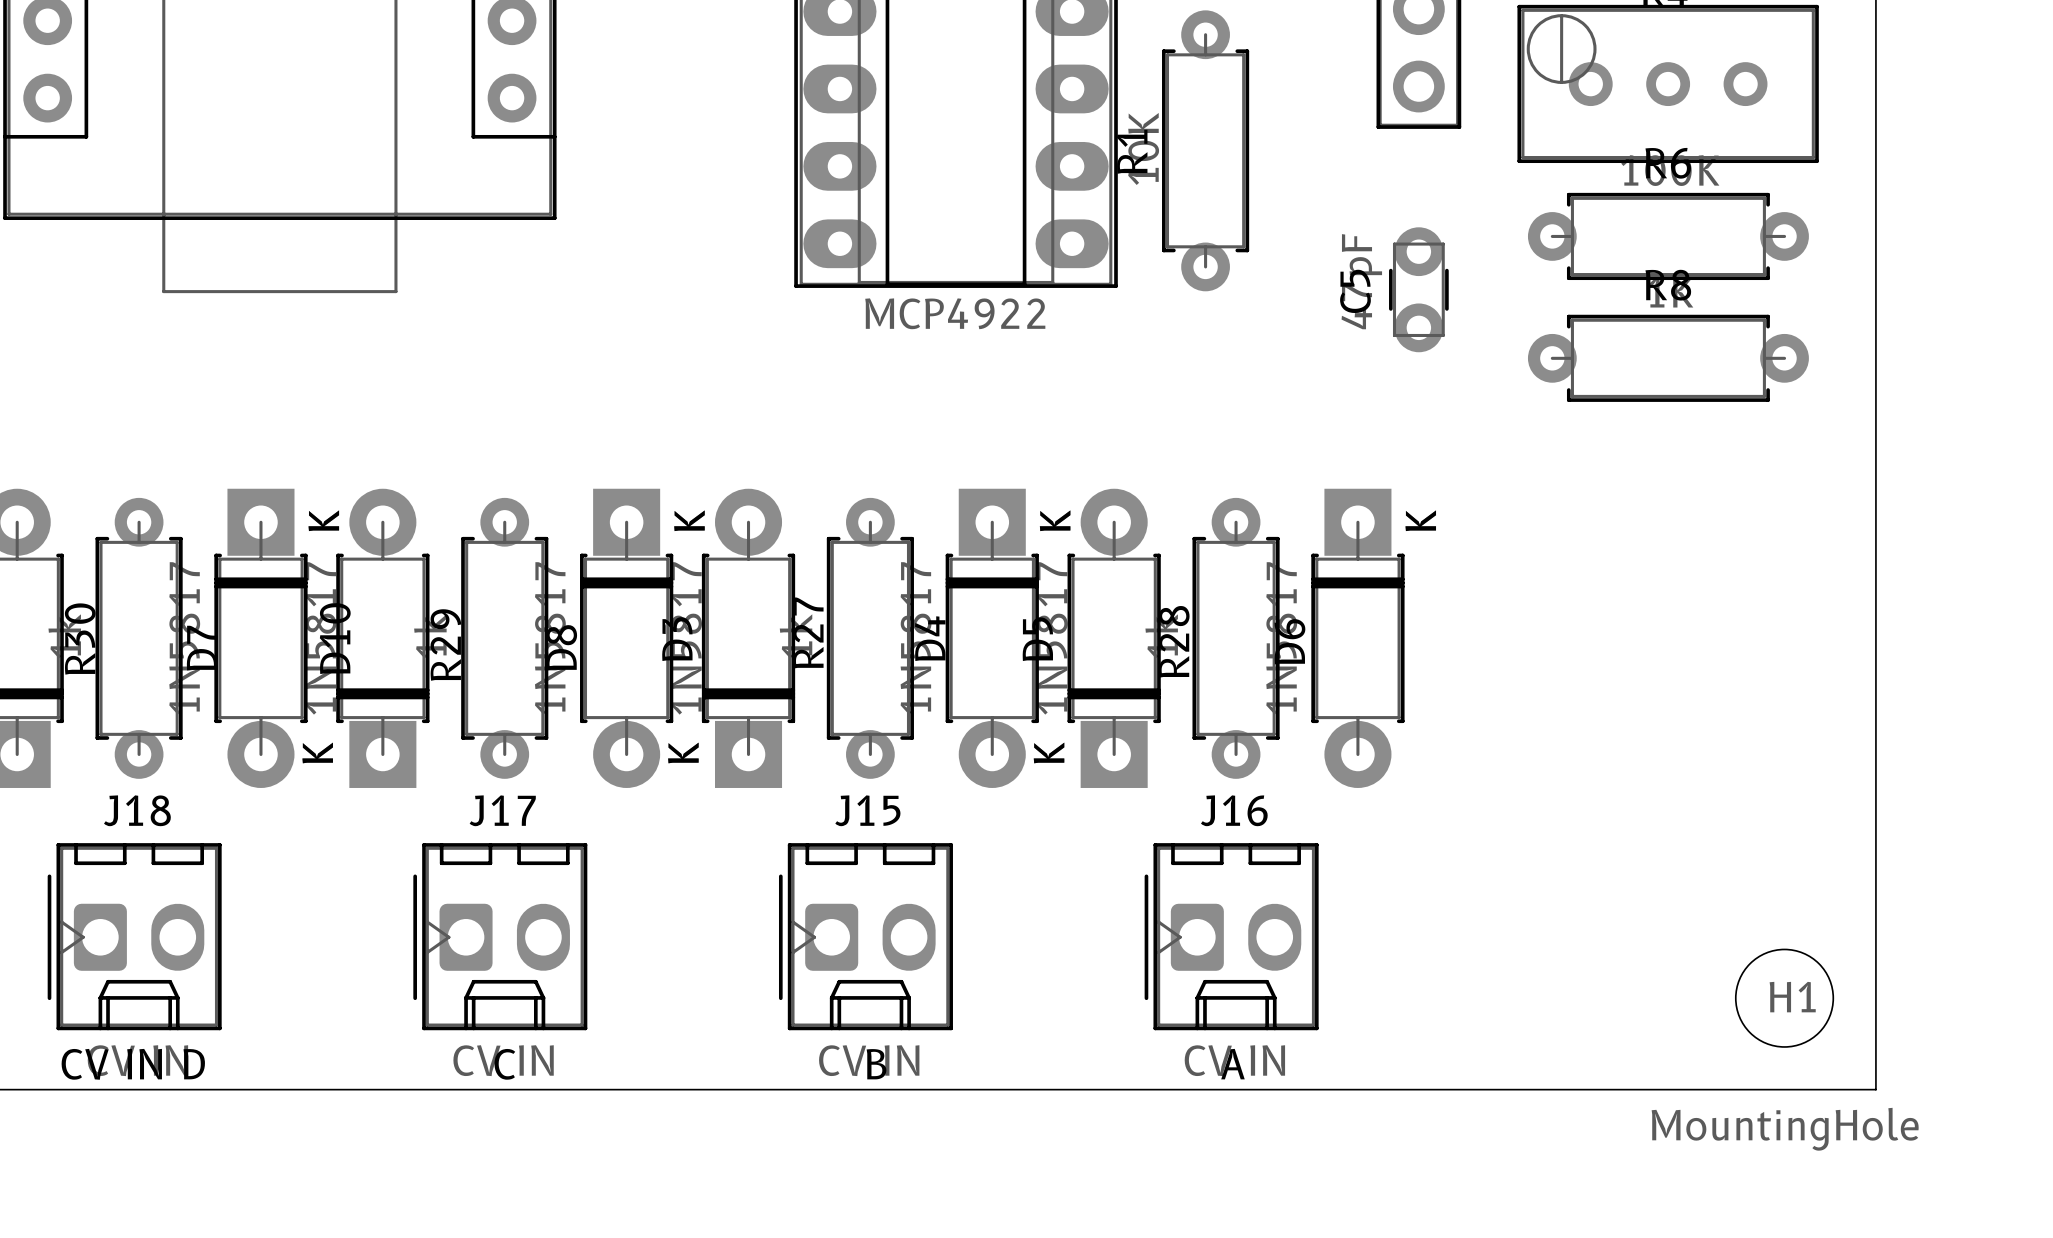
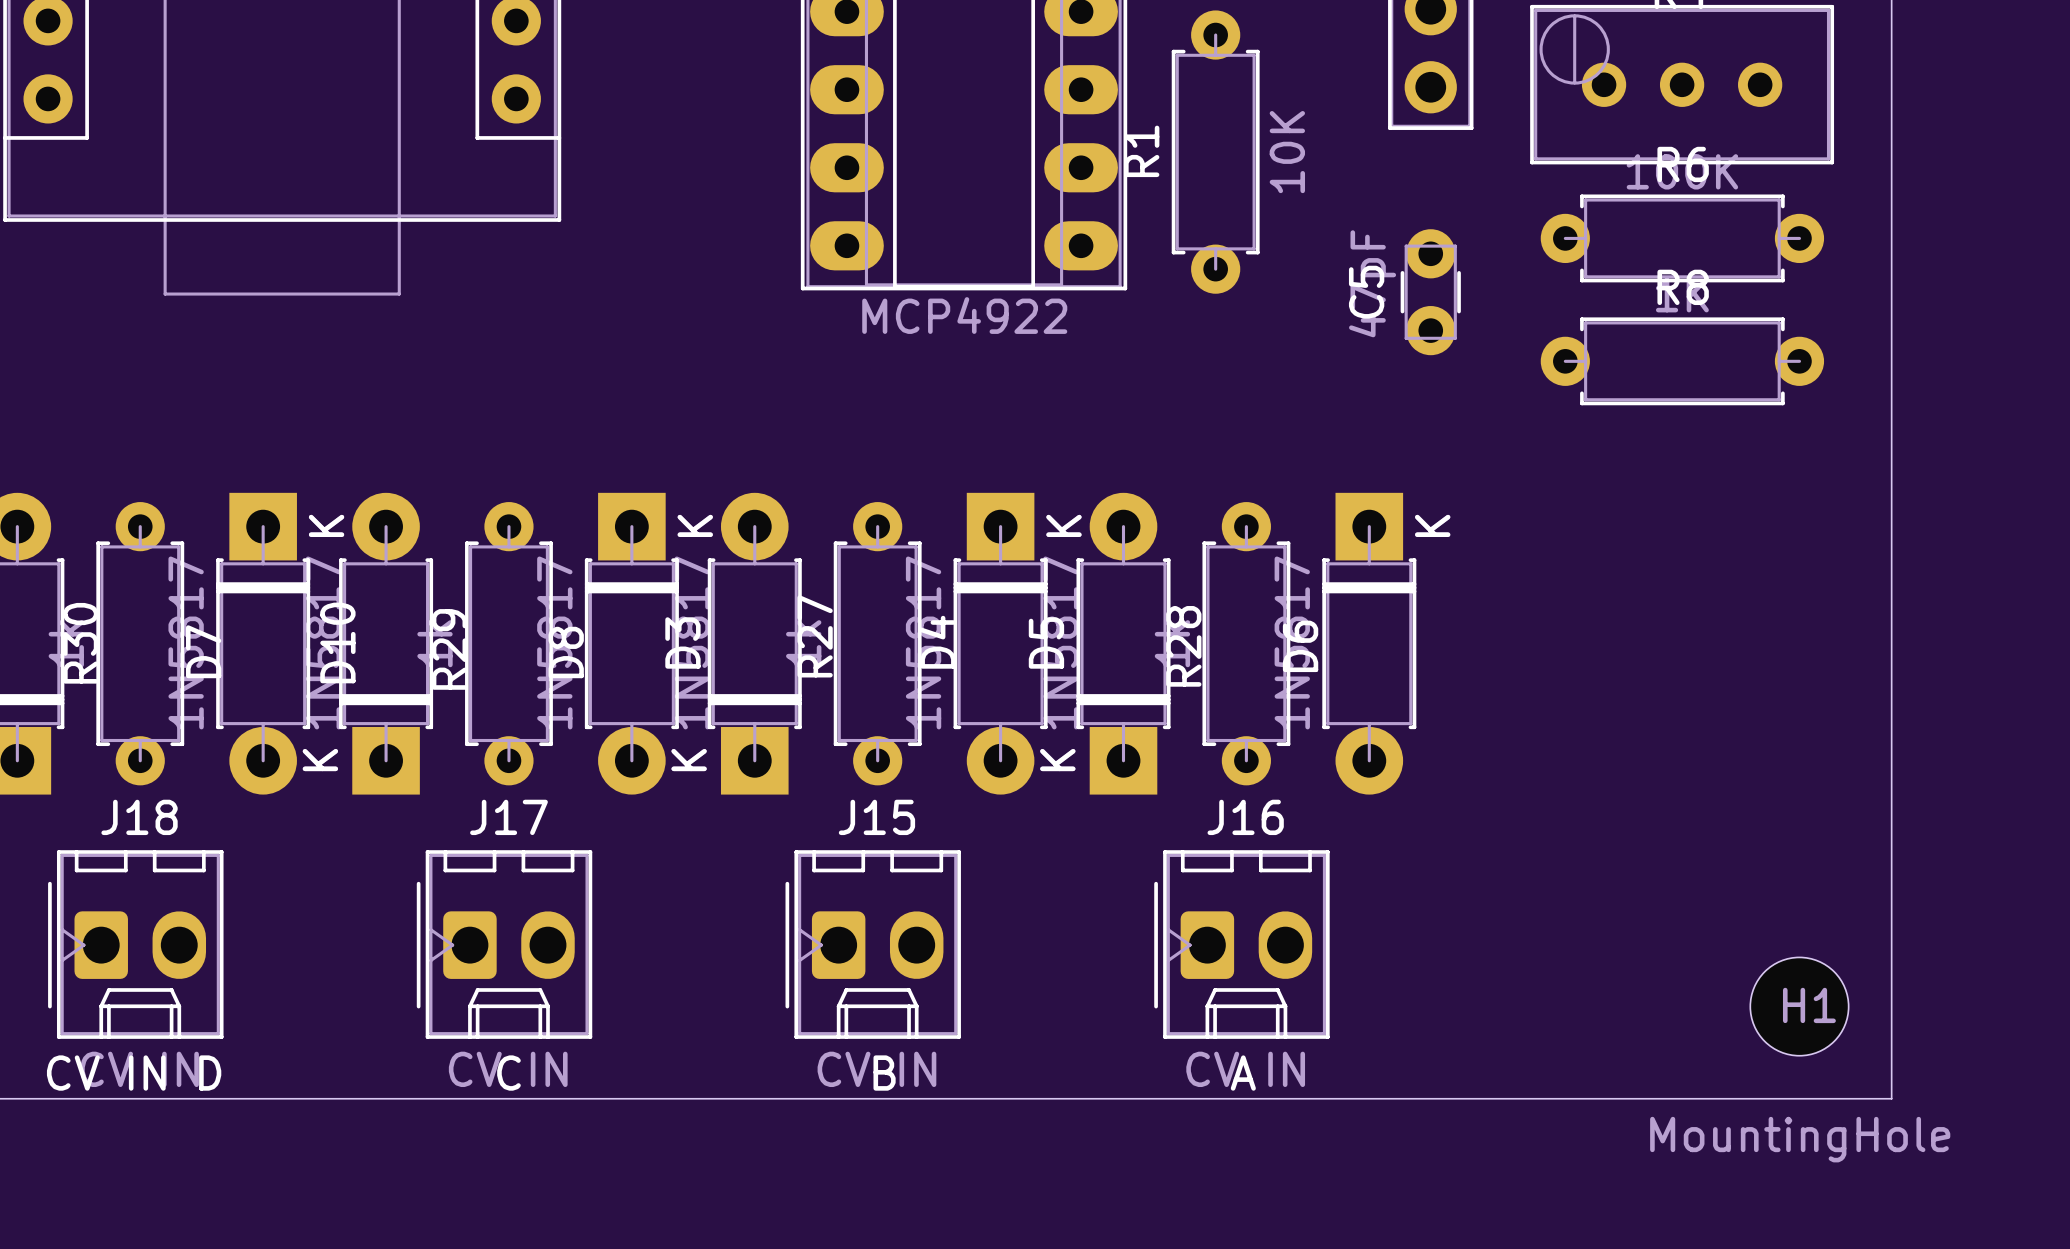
R1 value position: 10K (1143, 148) -> 10K (1287, 152)

